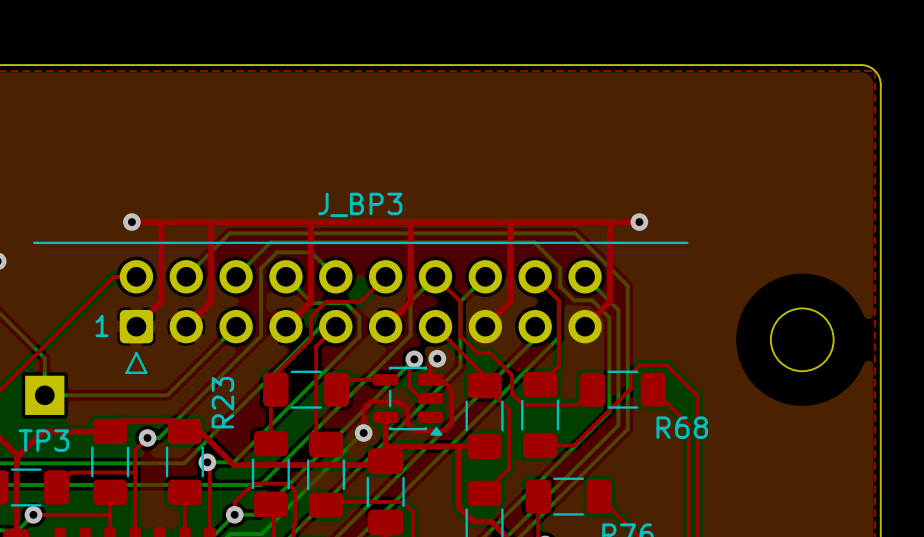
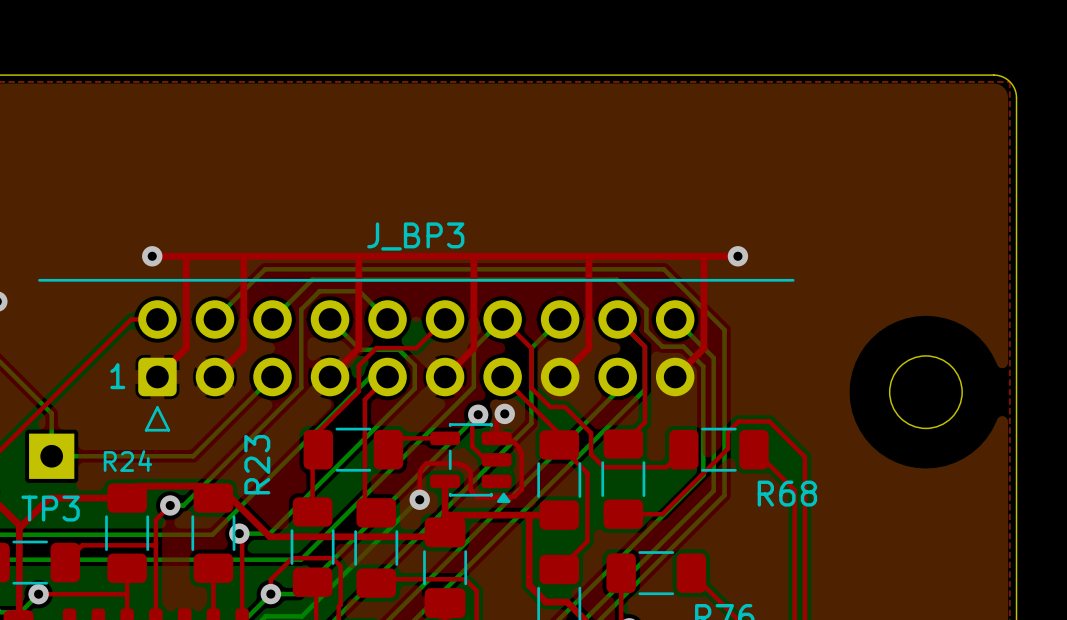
R24 name: none -> R24 (127, 461)

